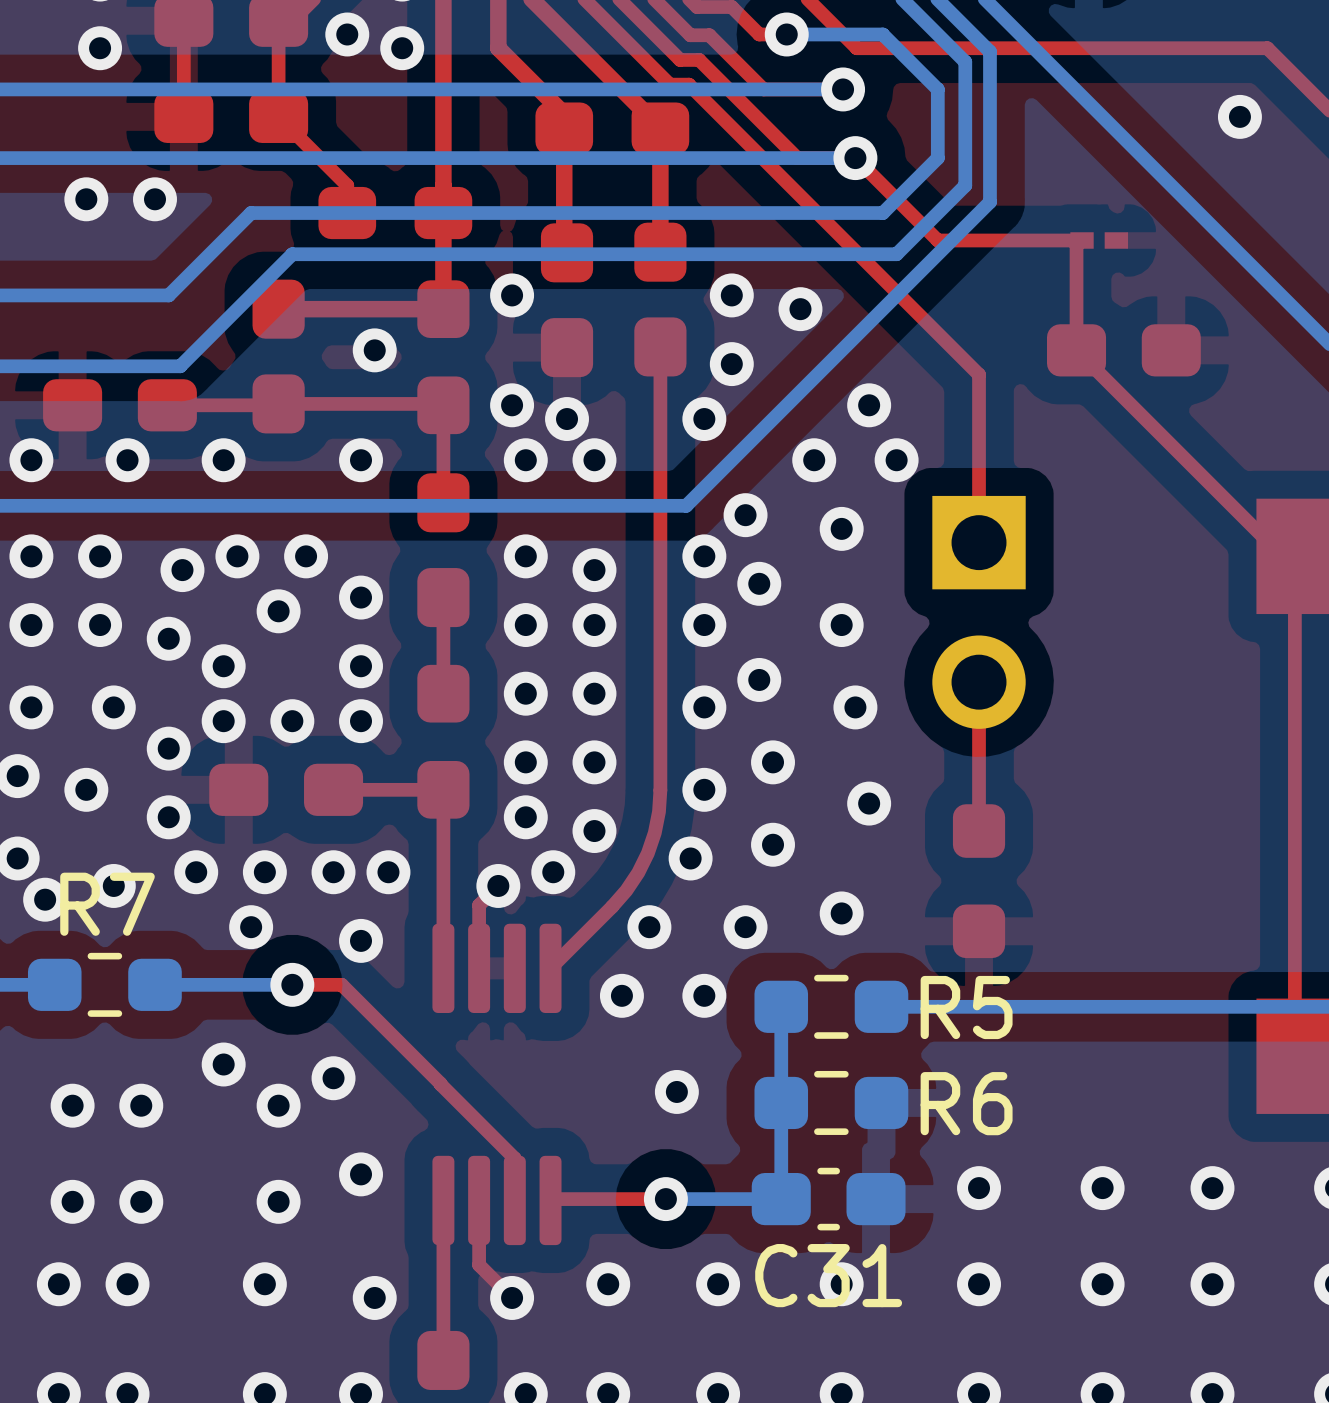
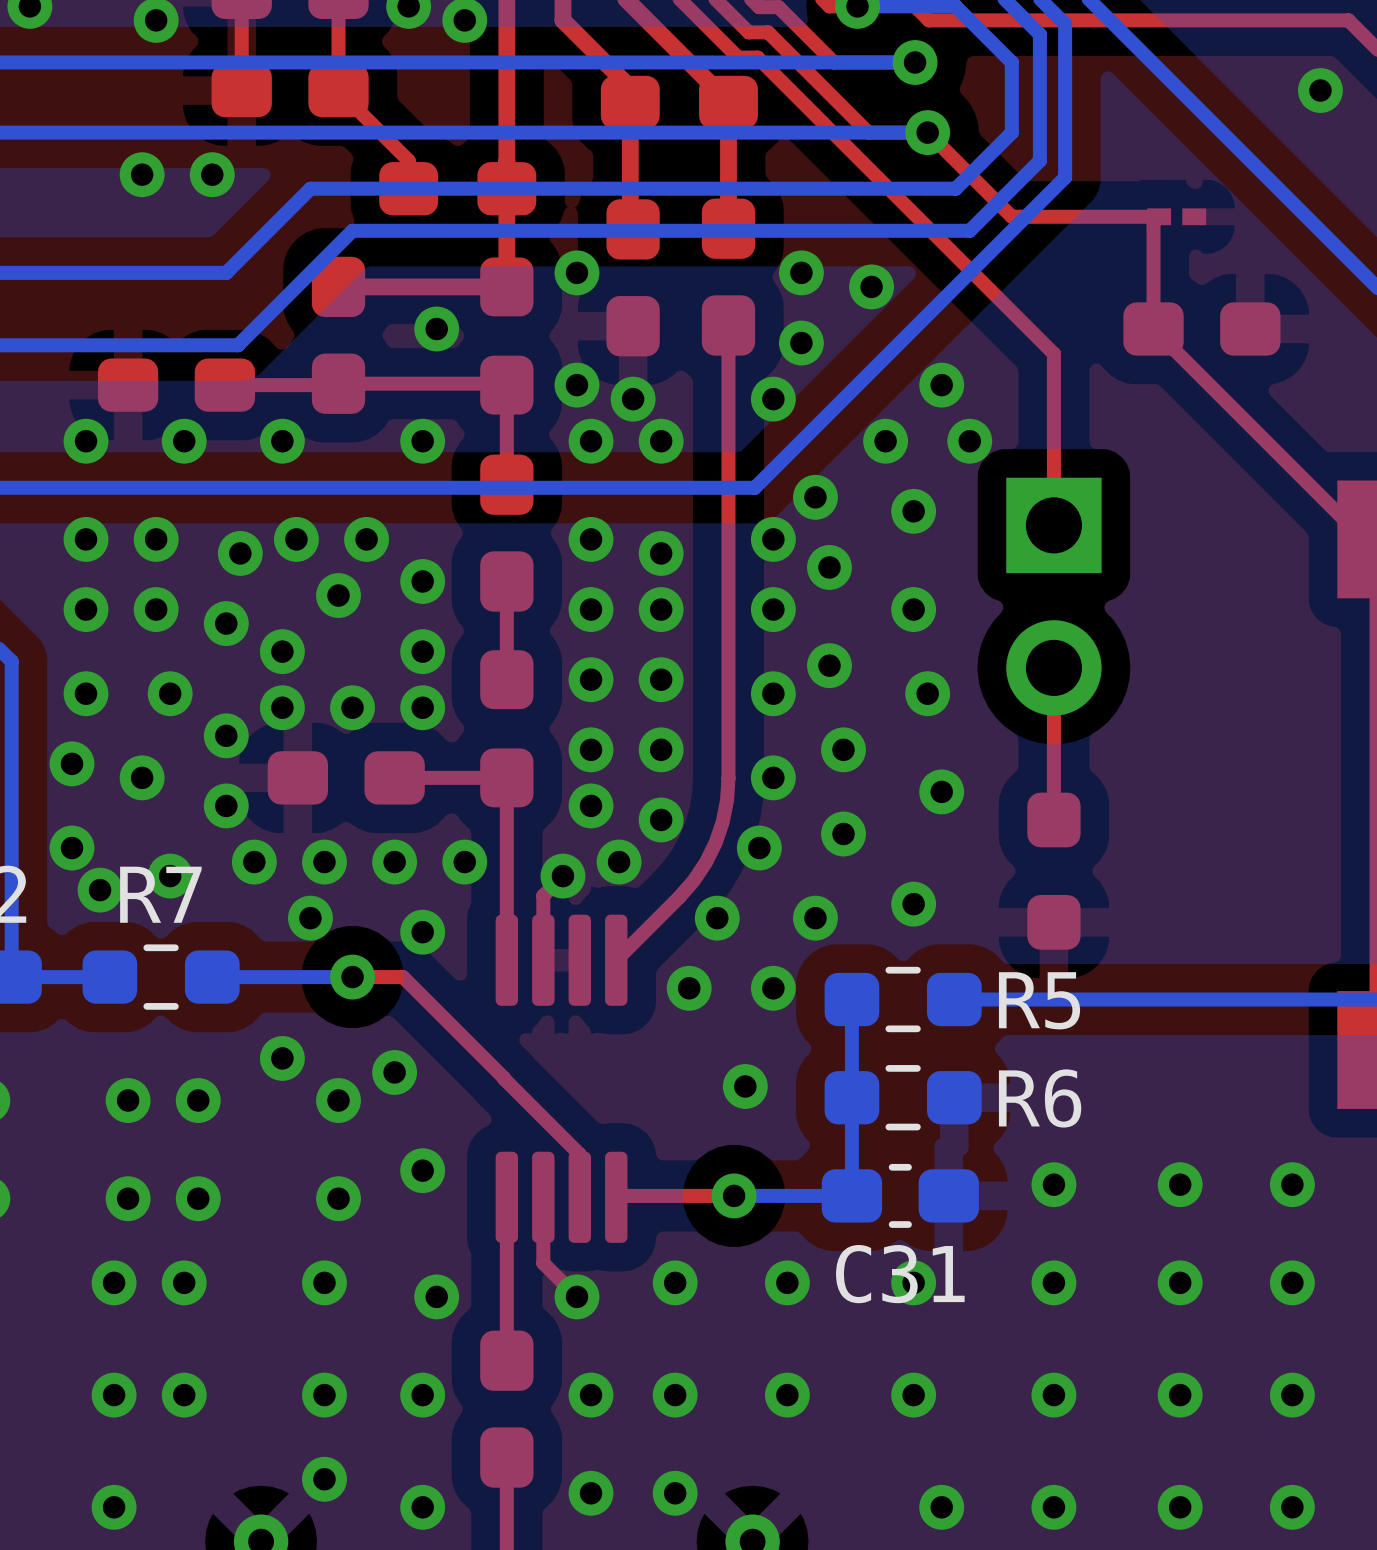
via position: (388, 872) -> (464, 862)

